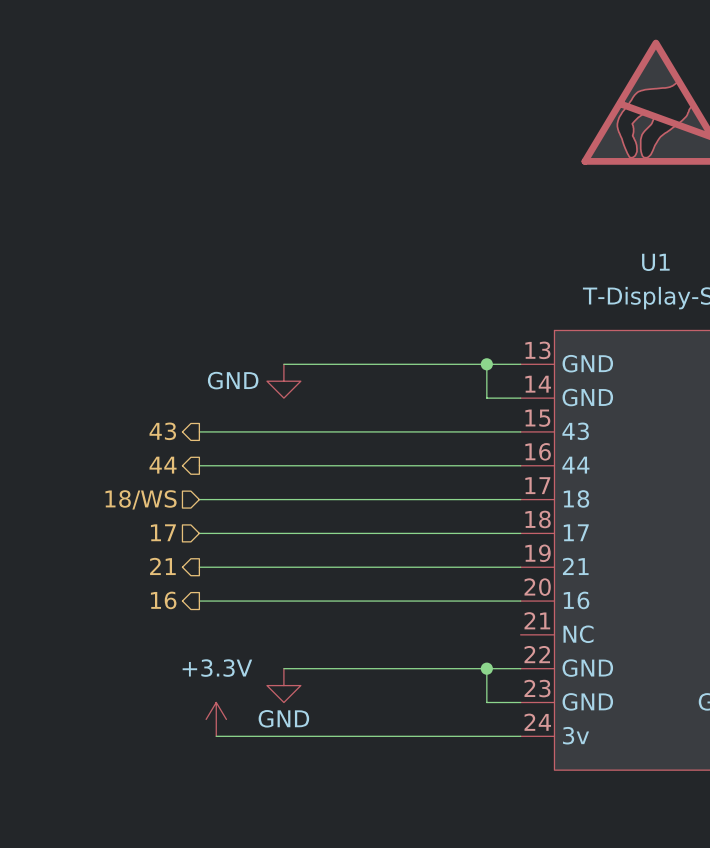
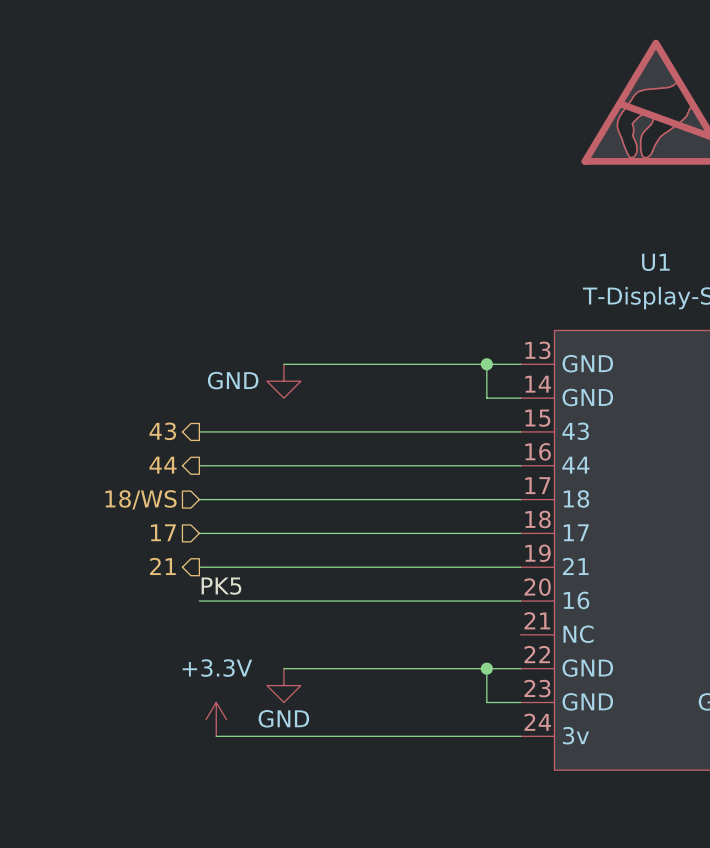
label: none -> PK5 (221, 586)
hierarchical label: 16 (163, 600) -> none

